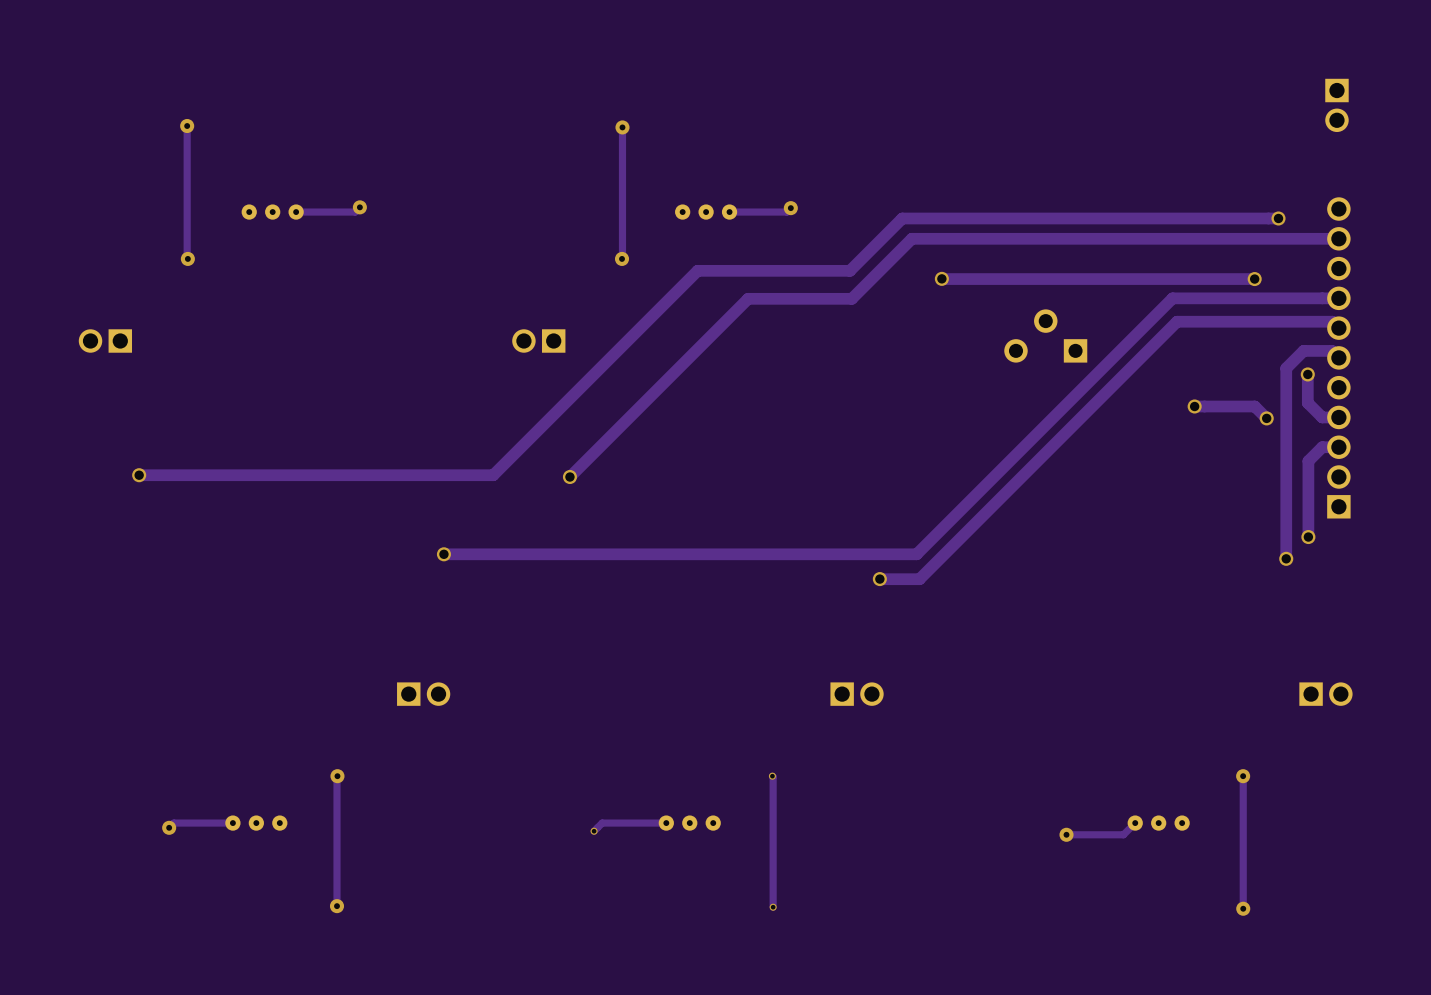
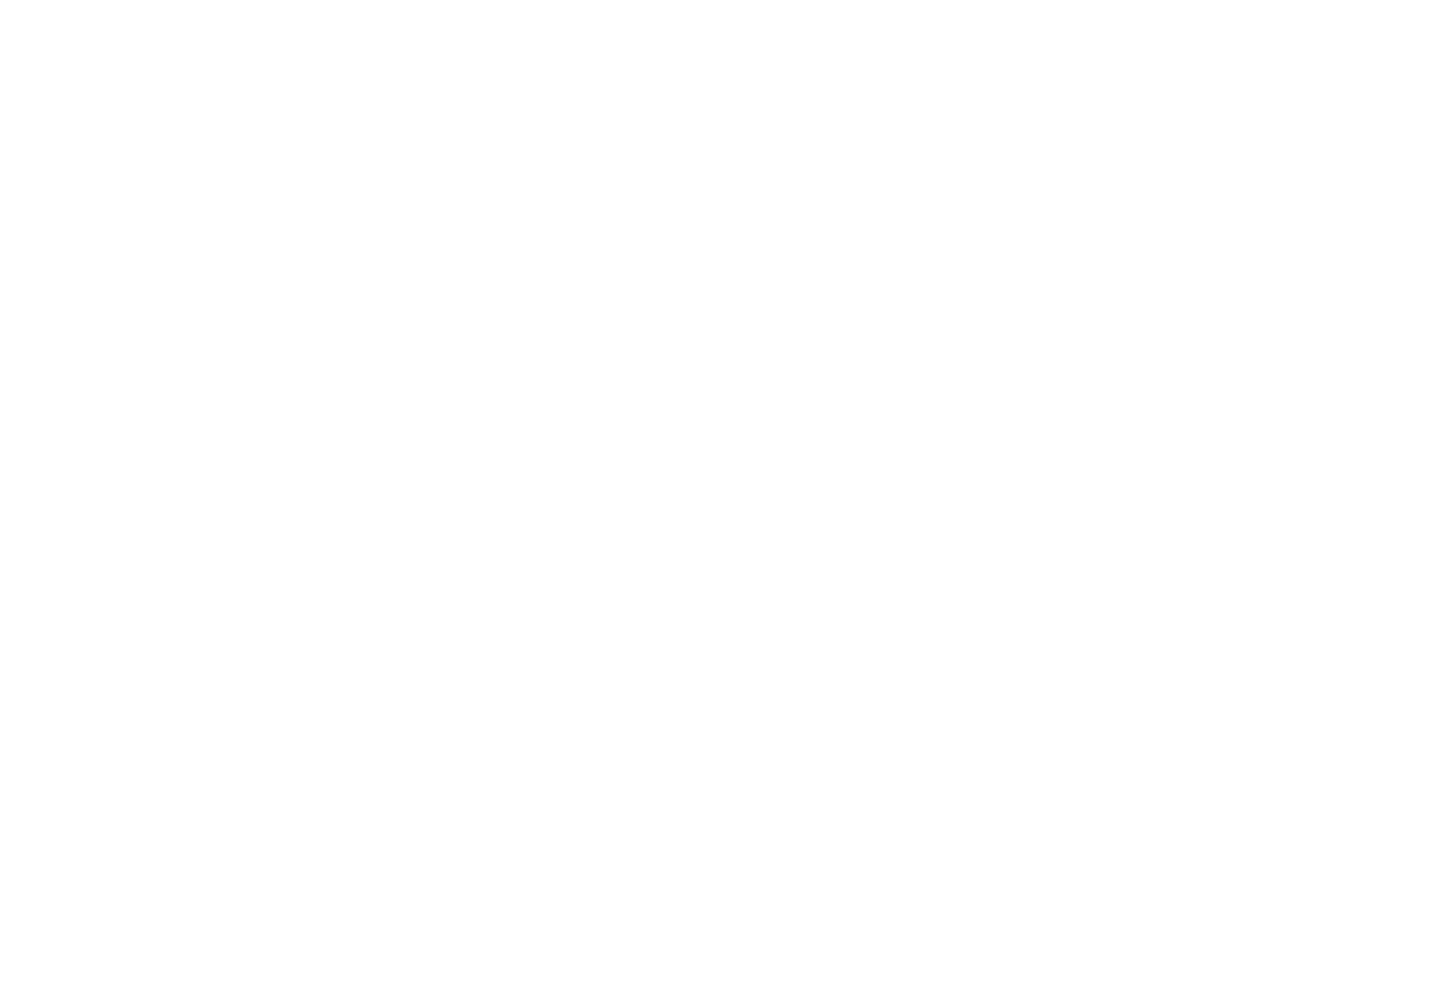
part: (1336, 105) -> none
track: (187, 126) (187, 258) -> none
via: (187, 126) -> none
track: (622, 127) (622, 258) -> none
via: (622, 127) -> none
track: (359, 207) (355, 212) (296, 212) -> none
via: (359, 207) -> none
track: (790, 208) (786, 212) (729, 212) -> none
via: (790, 208) -> none
part: (272, 212) -> none
part: (706, 212) -> none
track: (1278, 218) (902, 218) (849, 270) (697, 270) (493, 475) (139, 475) -> none
via: (1278, 218) -> none
track: (1338, 238) (911, 238) (851, 298) (748, 298) (569, 477) -> none
via: (187, 258) -> none
via: (622, 258) -> none
via: (941, 278) -> none
track: (1254, 279) (942, 279) -> none
via: (1254, 279) -> none
track: (1338, 298) (1172, 298) (916, 554) (443, 554) -> none
track: (1338, 328) (1332, 321) (1177, 321) (919, 579) (879, 579) -> none
part: (1045, 335) -> none
part: (105, 340) -> none
part: (538, 340) -> none
track: (1338, 357) (1331, 350) (1303, 350) (1286, 368) (1286, 558) -> none
part: (1338, 357) -> none
track: (1307, 374) (1307, 402) (1322, 417) (1338, 417) -> none
via: (1307, 374) -> none
track: (1194, 406) (1254, 406) (1266, 418) -> none
via: (1194, 406) -> none
via: (1266, 418) -> none
track: (1338, 447) (1322, 447) (1308, 461) (1308, 537) -> none
via: (139, 475) -> none
via: (569, 477) -> none
via: (1308, 537) -> none
via: (443, 554) -> none
via: (1286, 558) -> none
via: (879, 579) -> none
part: (423, 694) -> none
part: (857, 694) -> none
part: (1325, 694) -> none
track: (337, 776) (337, 906) -> none
via: (337, 776) -> none
track: (772, 776) (773, 907) -> none
via: (772, 776) -> none
track: (1243, 776) (1243, 908) -> none
via: (1243, 776) -> none
track: (232, 823) (173, 823) (169, 827) -> none
part: (256, 823) -> none
track: (666, 823) (602, 823) (594, 831) -> none
part: (689, 823) -> none
track: (1135, 823) (1123, 834) (1066, 834) -> none
part: (1158, 823) -> none
via: (169, 827) -> none
via: (594, 831) -> none
via: (1066, 834) -> none
via: (337, 906) -> none
via: (773, 907) -> none
via: (1243, 908) -> none

